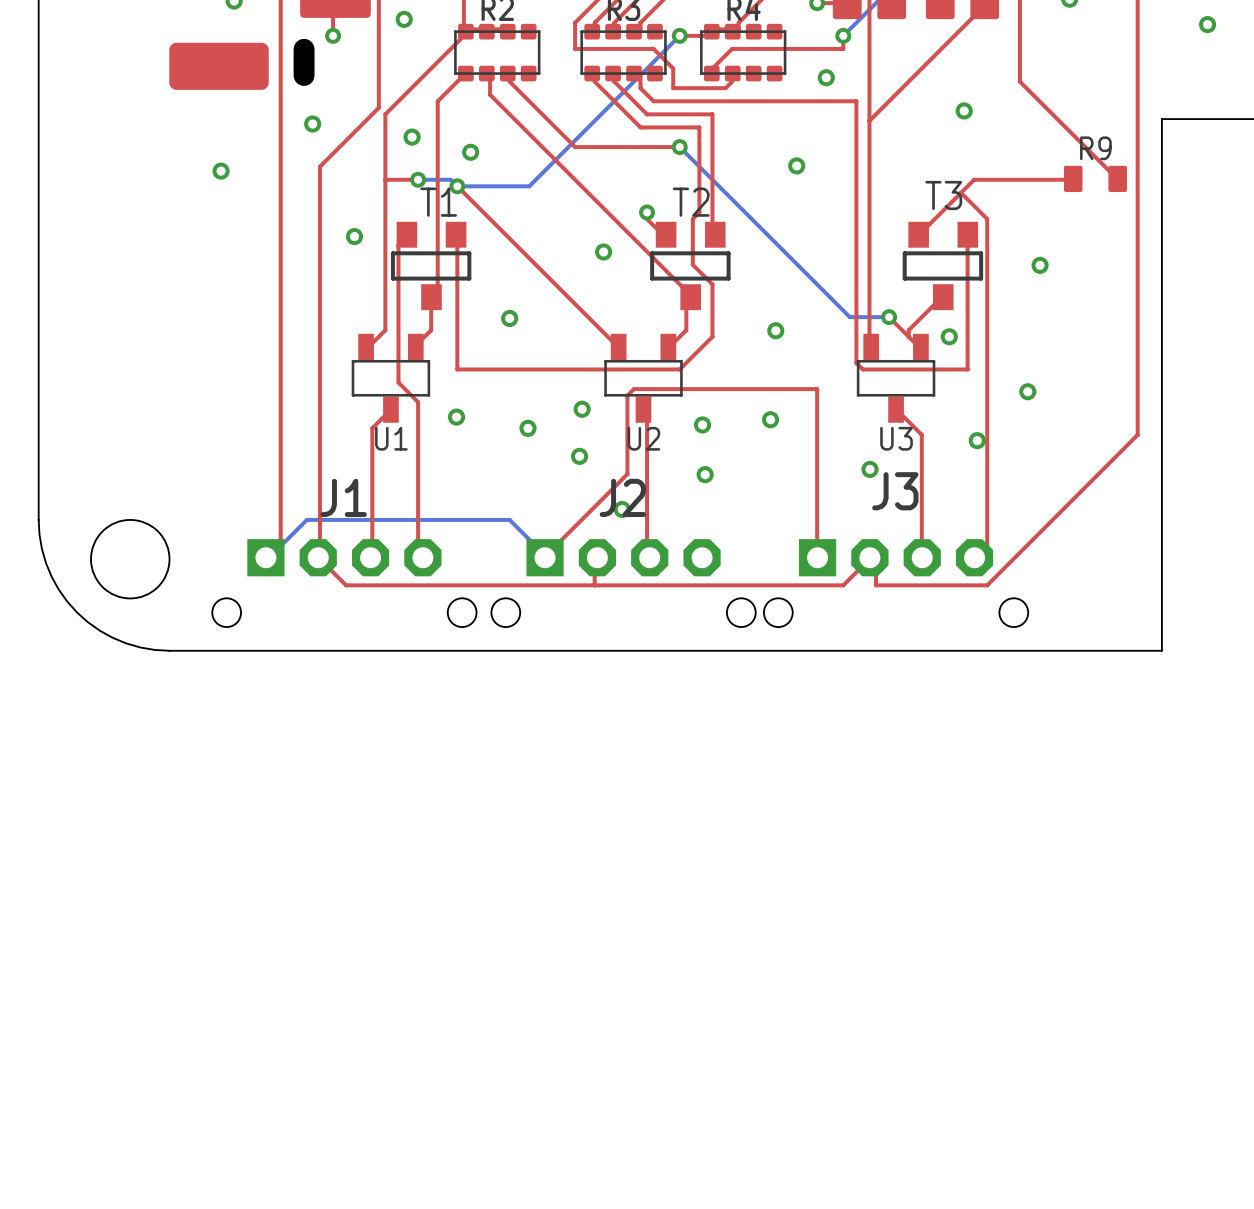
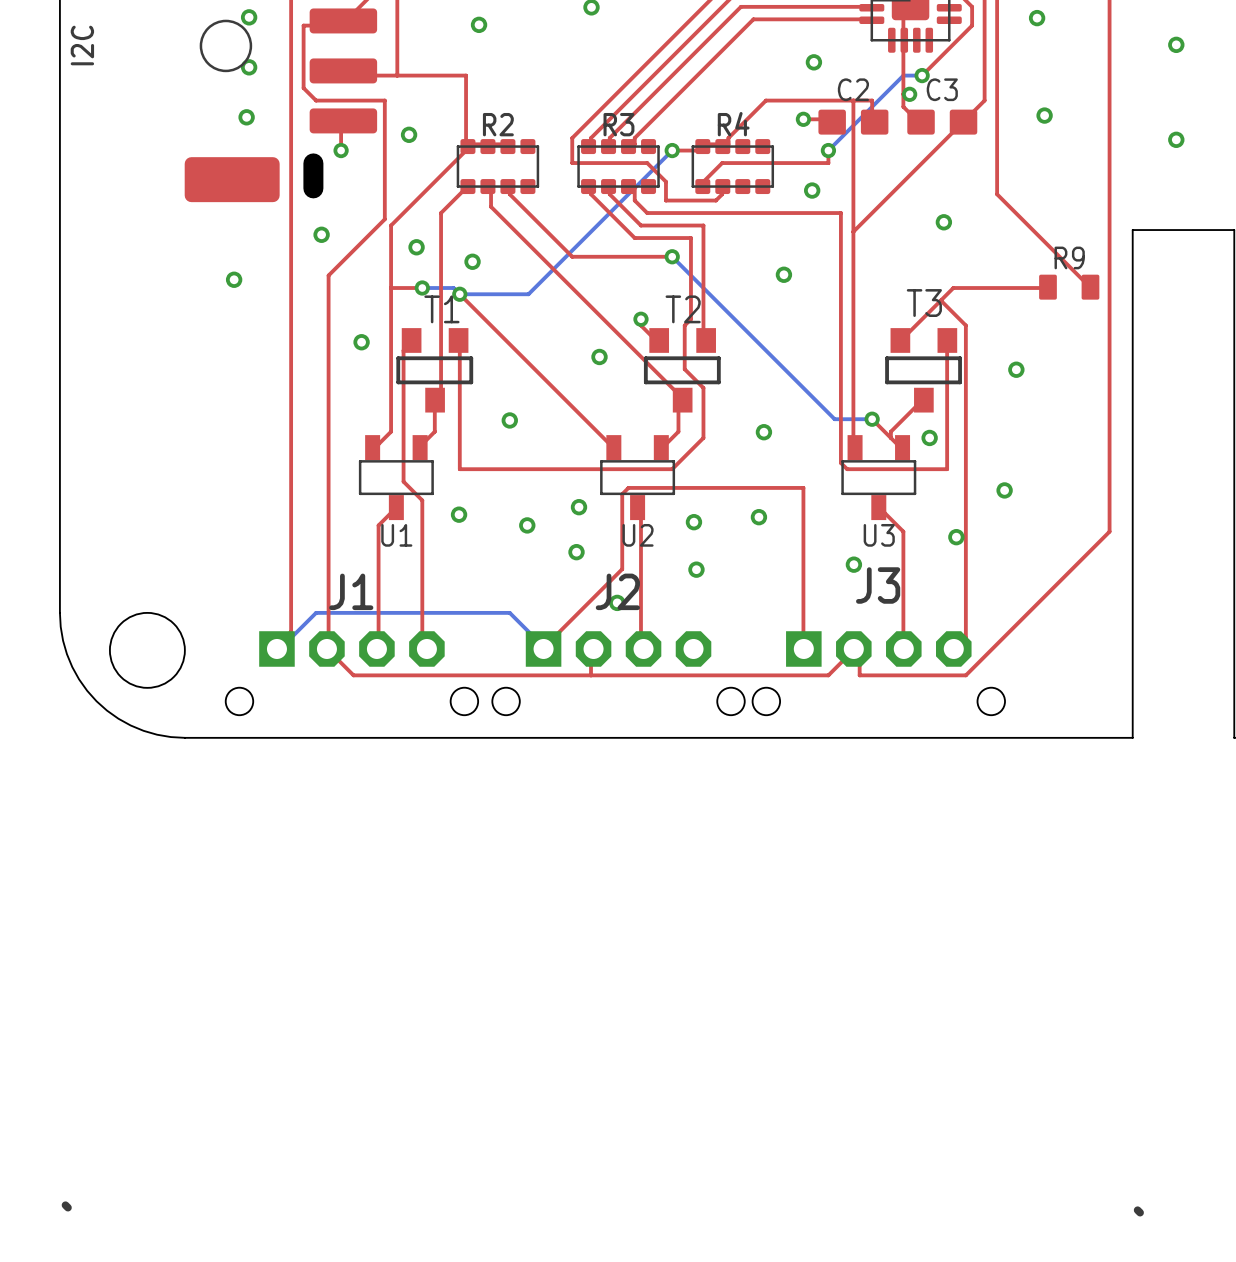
line: none -> (65, 1205) (67, 1207)
line: none -> (1137, 1210) (1140, 1212)

